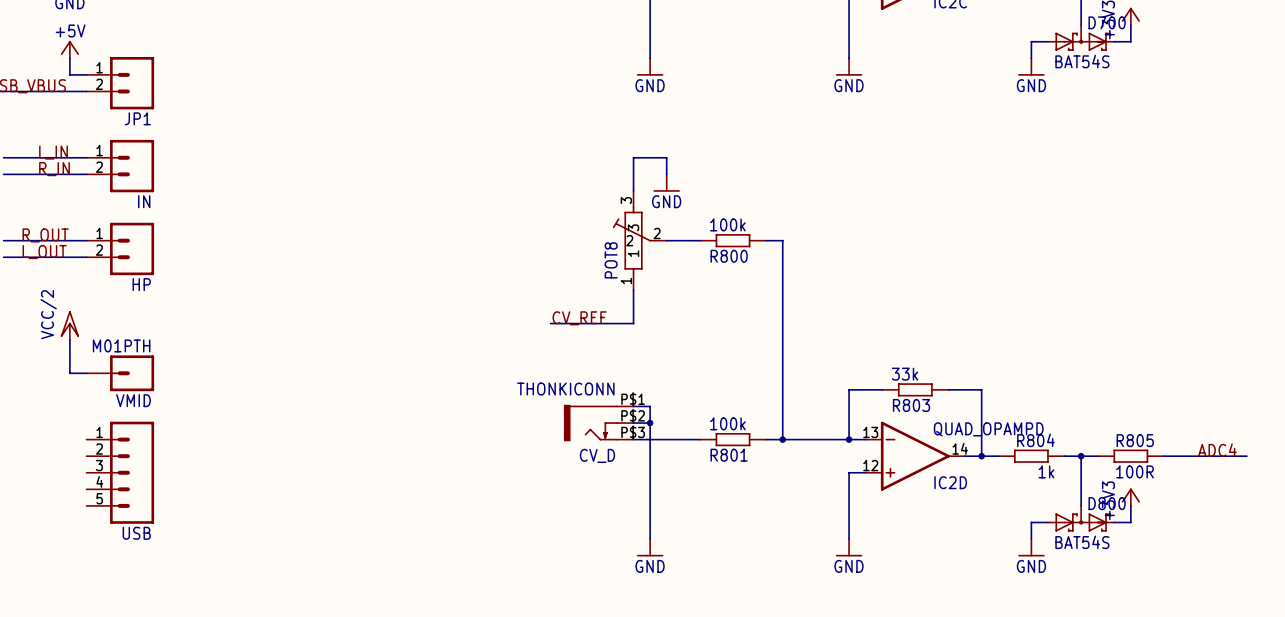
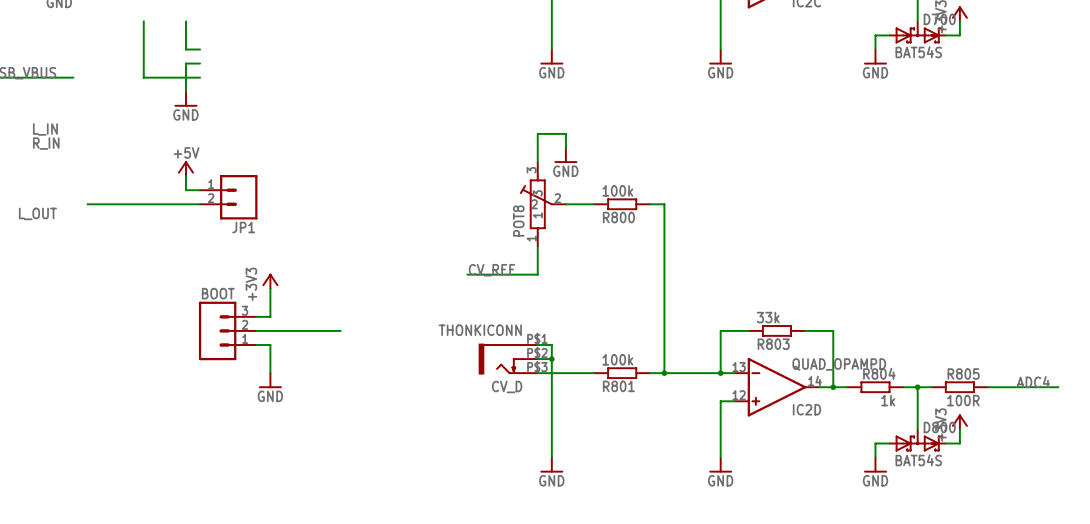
wire: none -> (143, 21) (143, 77) (200, 77)
wire: none -> (185, 21) (185, 49) (200, 49)
power symbol: +5V (69, 49) -> none
wire: (69, 58) (69, 74) (86, 74) -> none
wire: none -> (200, 63) (185, 63) (185, 91)
JP1 position: (120, 83) -> (228, 197)
power symbol: none -> GND (185, 99)
wire: (3, 157) (86, 157) -> none
IN: (120, 166) -> none
wire: (3, 174) (86, 174) -> none
power symbol: none -> +5V (185, 168)
wire: none -> (185, 176) (185, 190) (200, 190)
label: R_OUT (45, 235) -> none
wire: (3, 240) (86, 240) -> none
wire: none -> (87, 204) (200, 204)
HP: (120, 248) -> none
wire: (3, 257) (86, 257) -> none
power symbol: VCC/2 (69, 325) -> none
power symbol: none -> +3V3 (270, 281)
wire: (69, 340) (69, 373) (86, 373) -> none
wire: none -> (270, 288) (270, 316) (256, 316)
VMID: M01PTH (120, 373) -> none
BOOT: none -> (227, 330)
wire: none -> (256, 330) (340, 330)
wire: none -> (256, 345) (270, 345) (270, 373)
power symbol: none -> GND (270, 380)
USB: (120, 472) -> none

